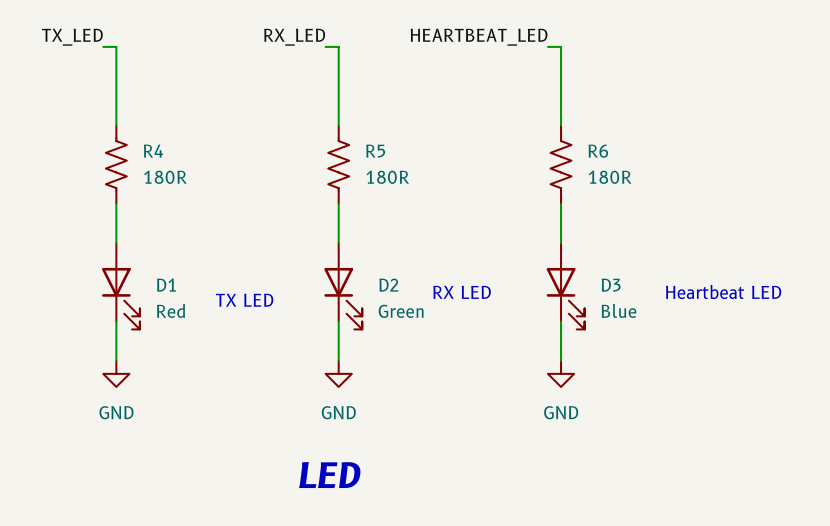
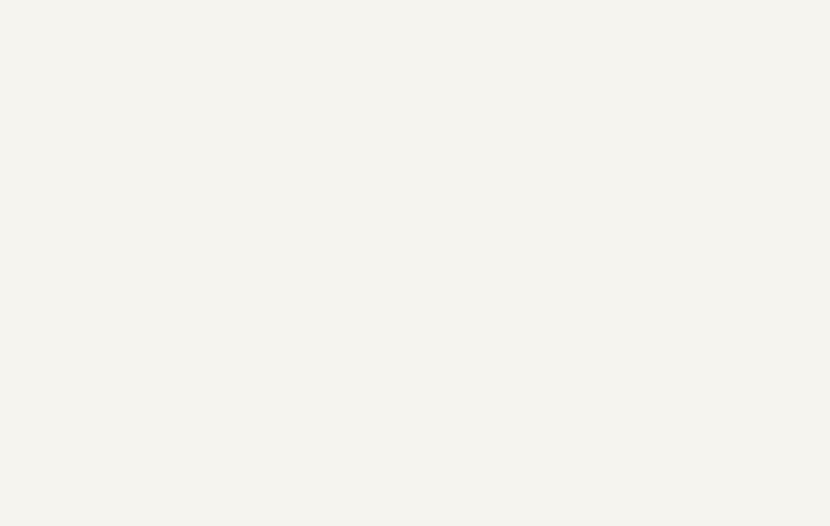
label: TX_LED (72, 37) -> none
label: RX_LED (294, 37) -> none
label: HEARTBEAT_LED (479, 37) -> none
wire: (103, 46) (116, 46) (116, 125) -> none
wire: (325, 46) (338, 46) (338, 125) -> none
wire: (547, 46) (561, 46) (561, 125) -> none
R4: 180R (116, 164) -> none
R5: 180R (338, 164) -> none
R6: 180R (561, 164) -> none
wire: (116, 203) (116, 243) -> none
wire: (338, 203) (338, 243) -> none
wire: (561, 203) (561, 243) -> none
D1: Red (120, 286) -> none
D2: Green (343, 286) -> none
D3: Blue (565, 286) -> none
text: Heartbeat LED (723, 291) -> none
text: RX LED (462, 292) -> none
text: TX LED (244, 300) -> none
wire: (116, 321) (116, 360) -> none
wire: (338, 321) (338, 360) -> none
wire: (561, 321) (561, 360) -> none
power symbol: GND (116, 373) -> none
power symbol: GND (338, 373) -> none
power symbol: GND (561, 373) -> none
text: LED (329, 474) -> none

